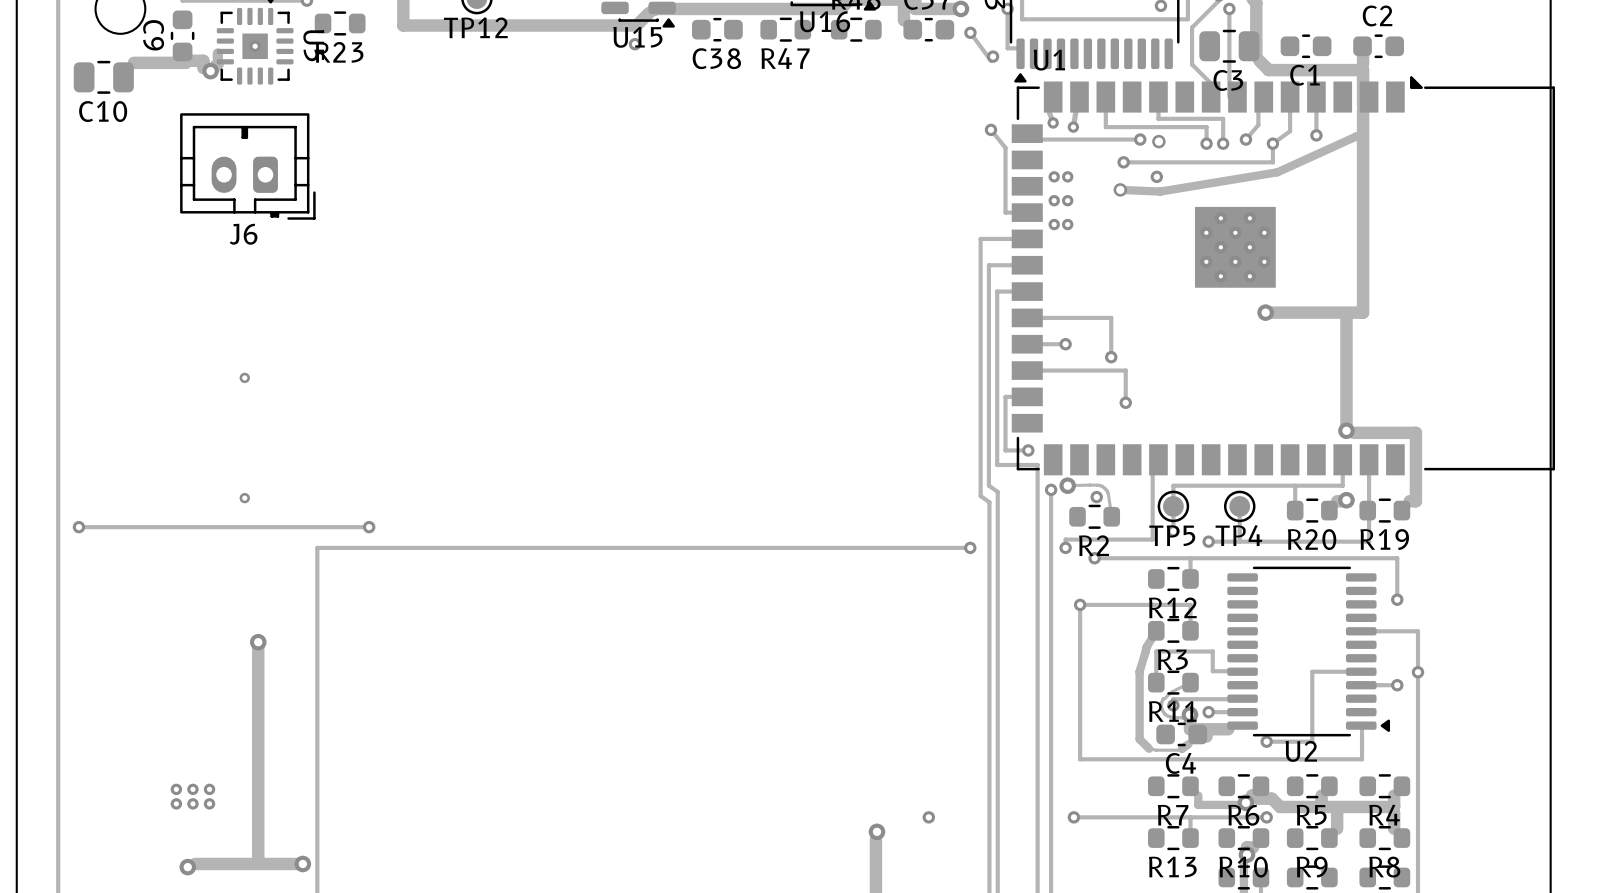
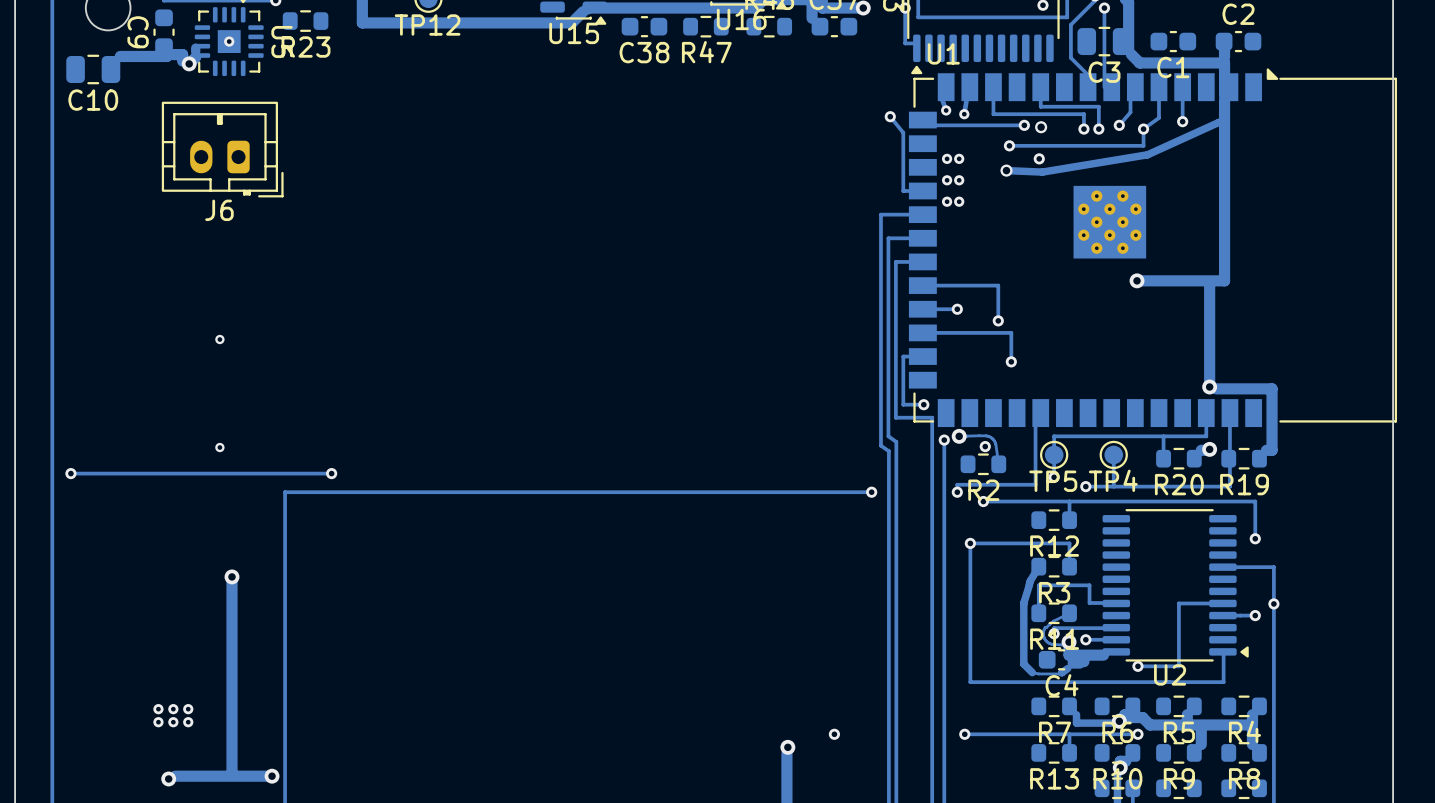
track: (970, 32) (990, 60) (993, 56) -> none
via: (970, 32) -> none
via: (635, 44) -> none
via: (993, 56) -> none

